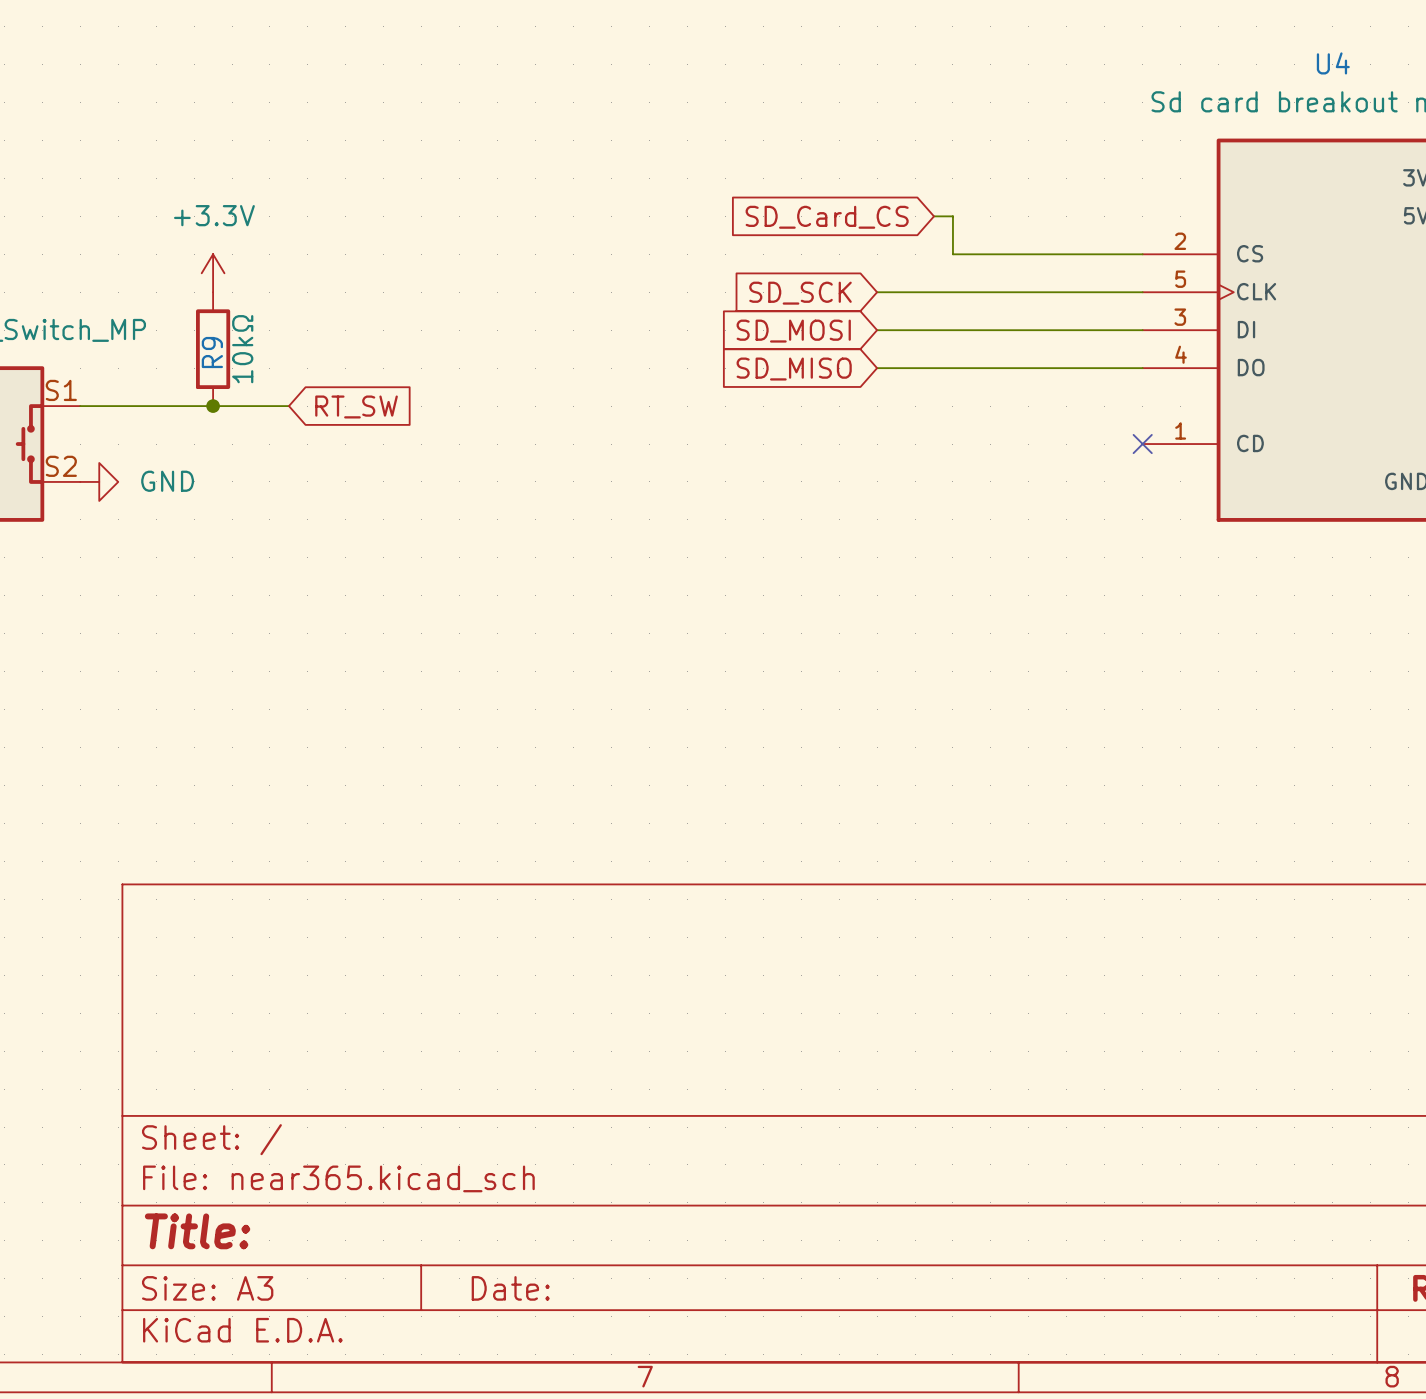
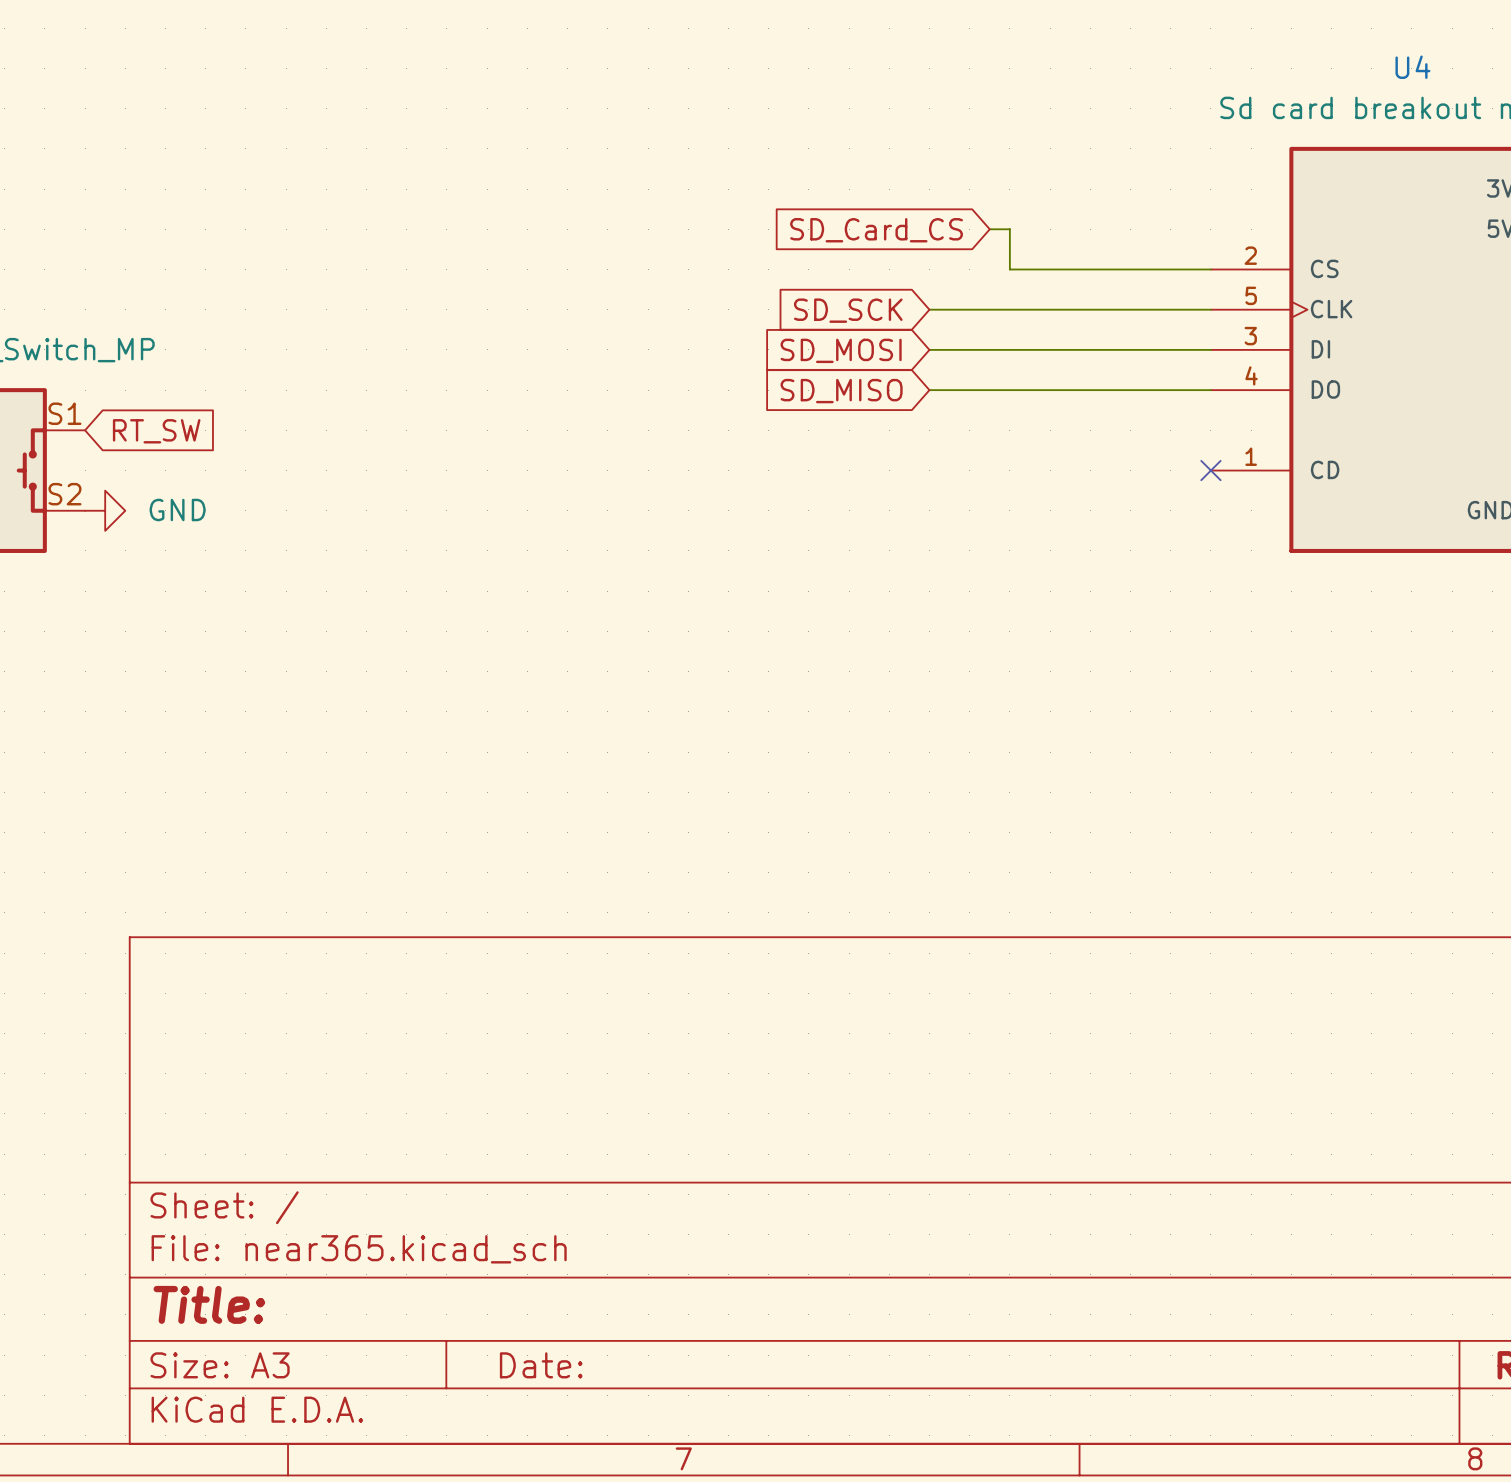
power symbol: +3.3V (213, 273) -> none
R9: 10kΩ (213, 349) -> none
wire: (80, 406) (288, 406) -> none
junction: (213, 406) -> none
global label position: RT_SW (356, 406) -> RT_SW (156, 431)

